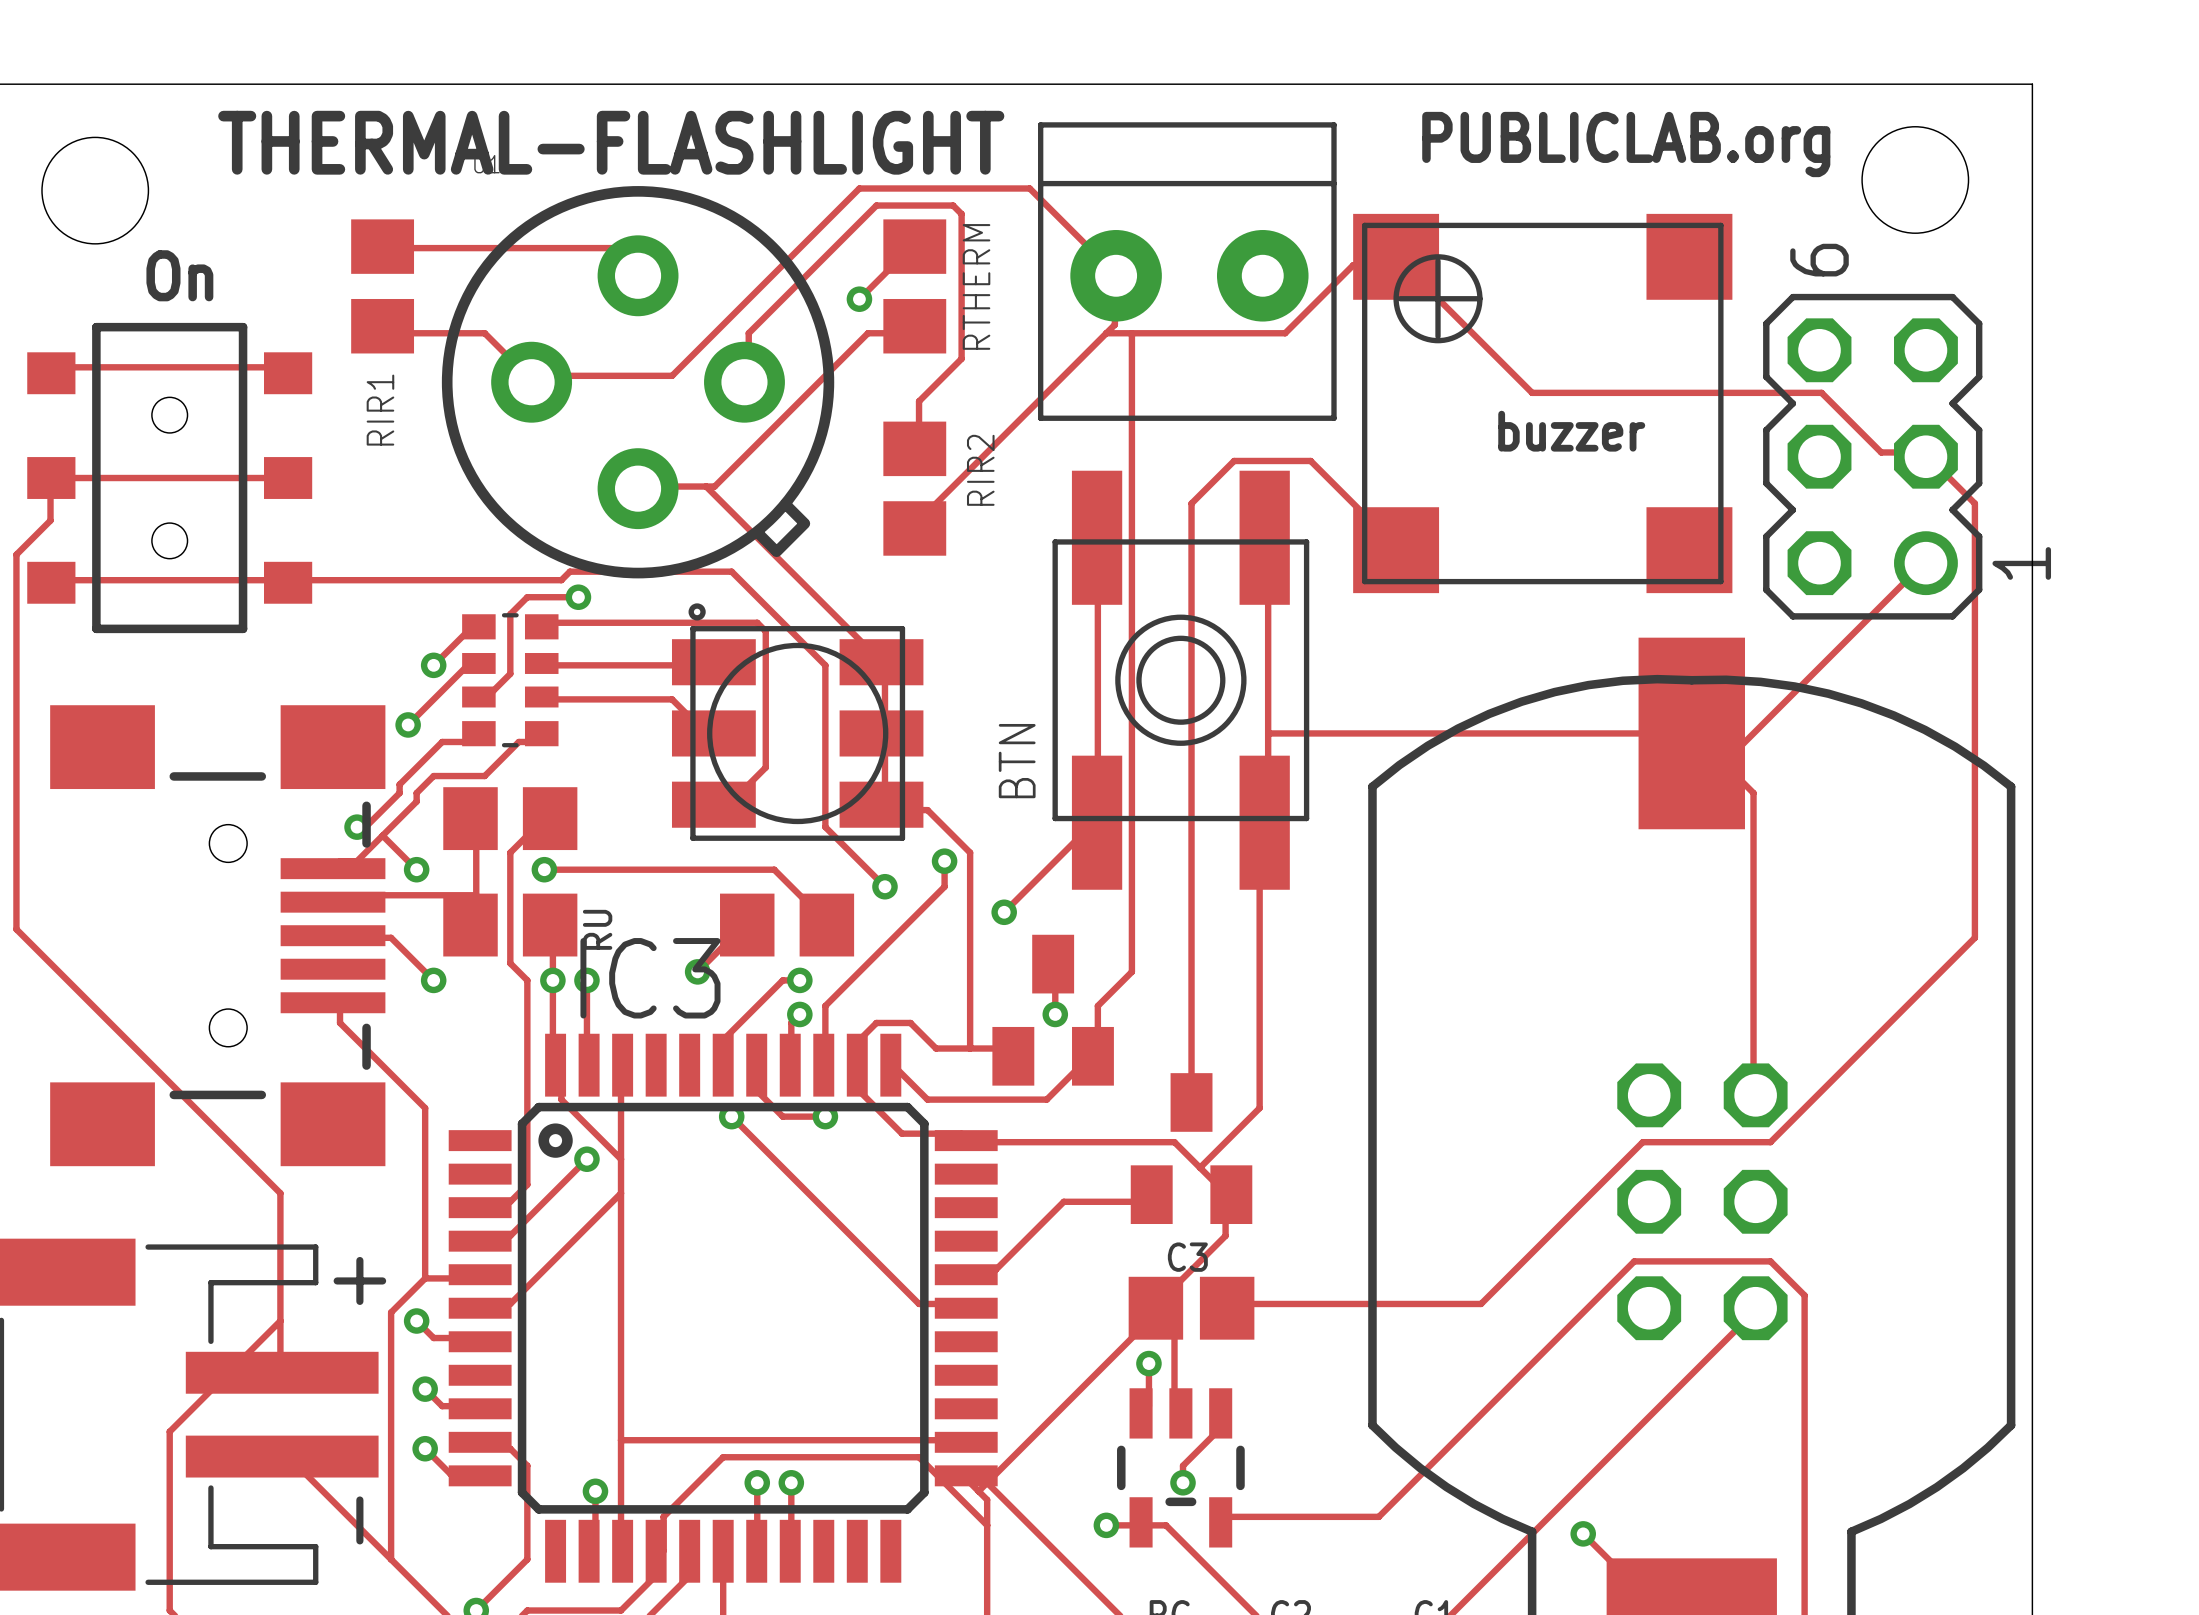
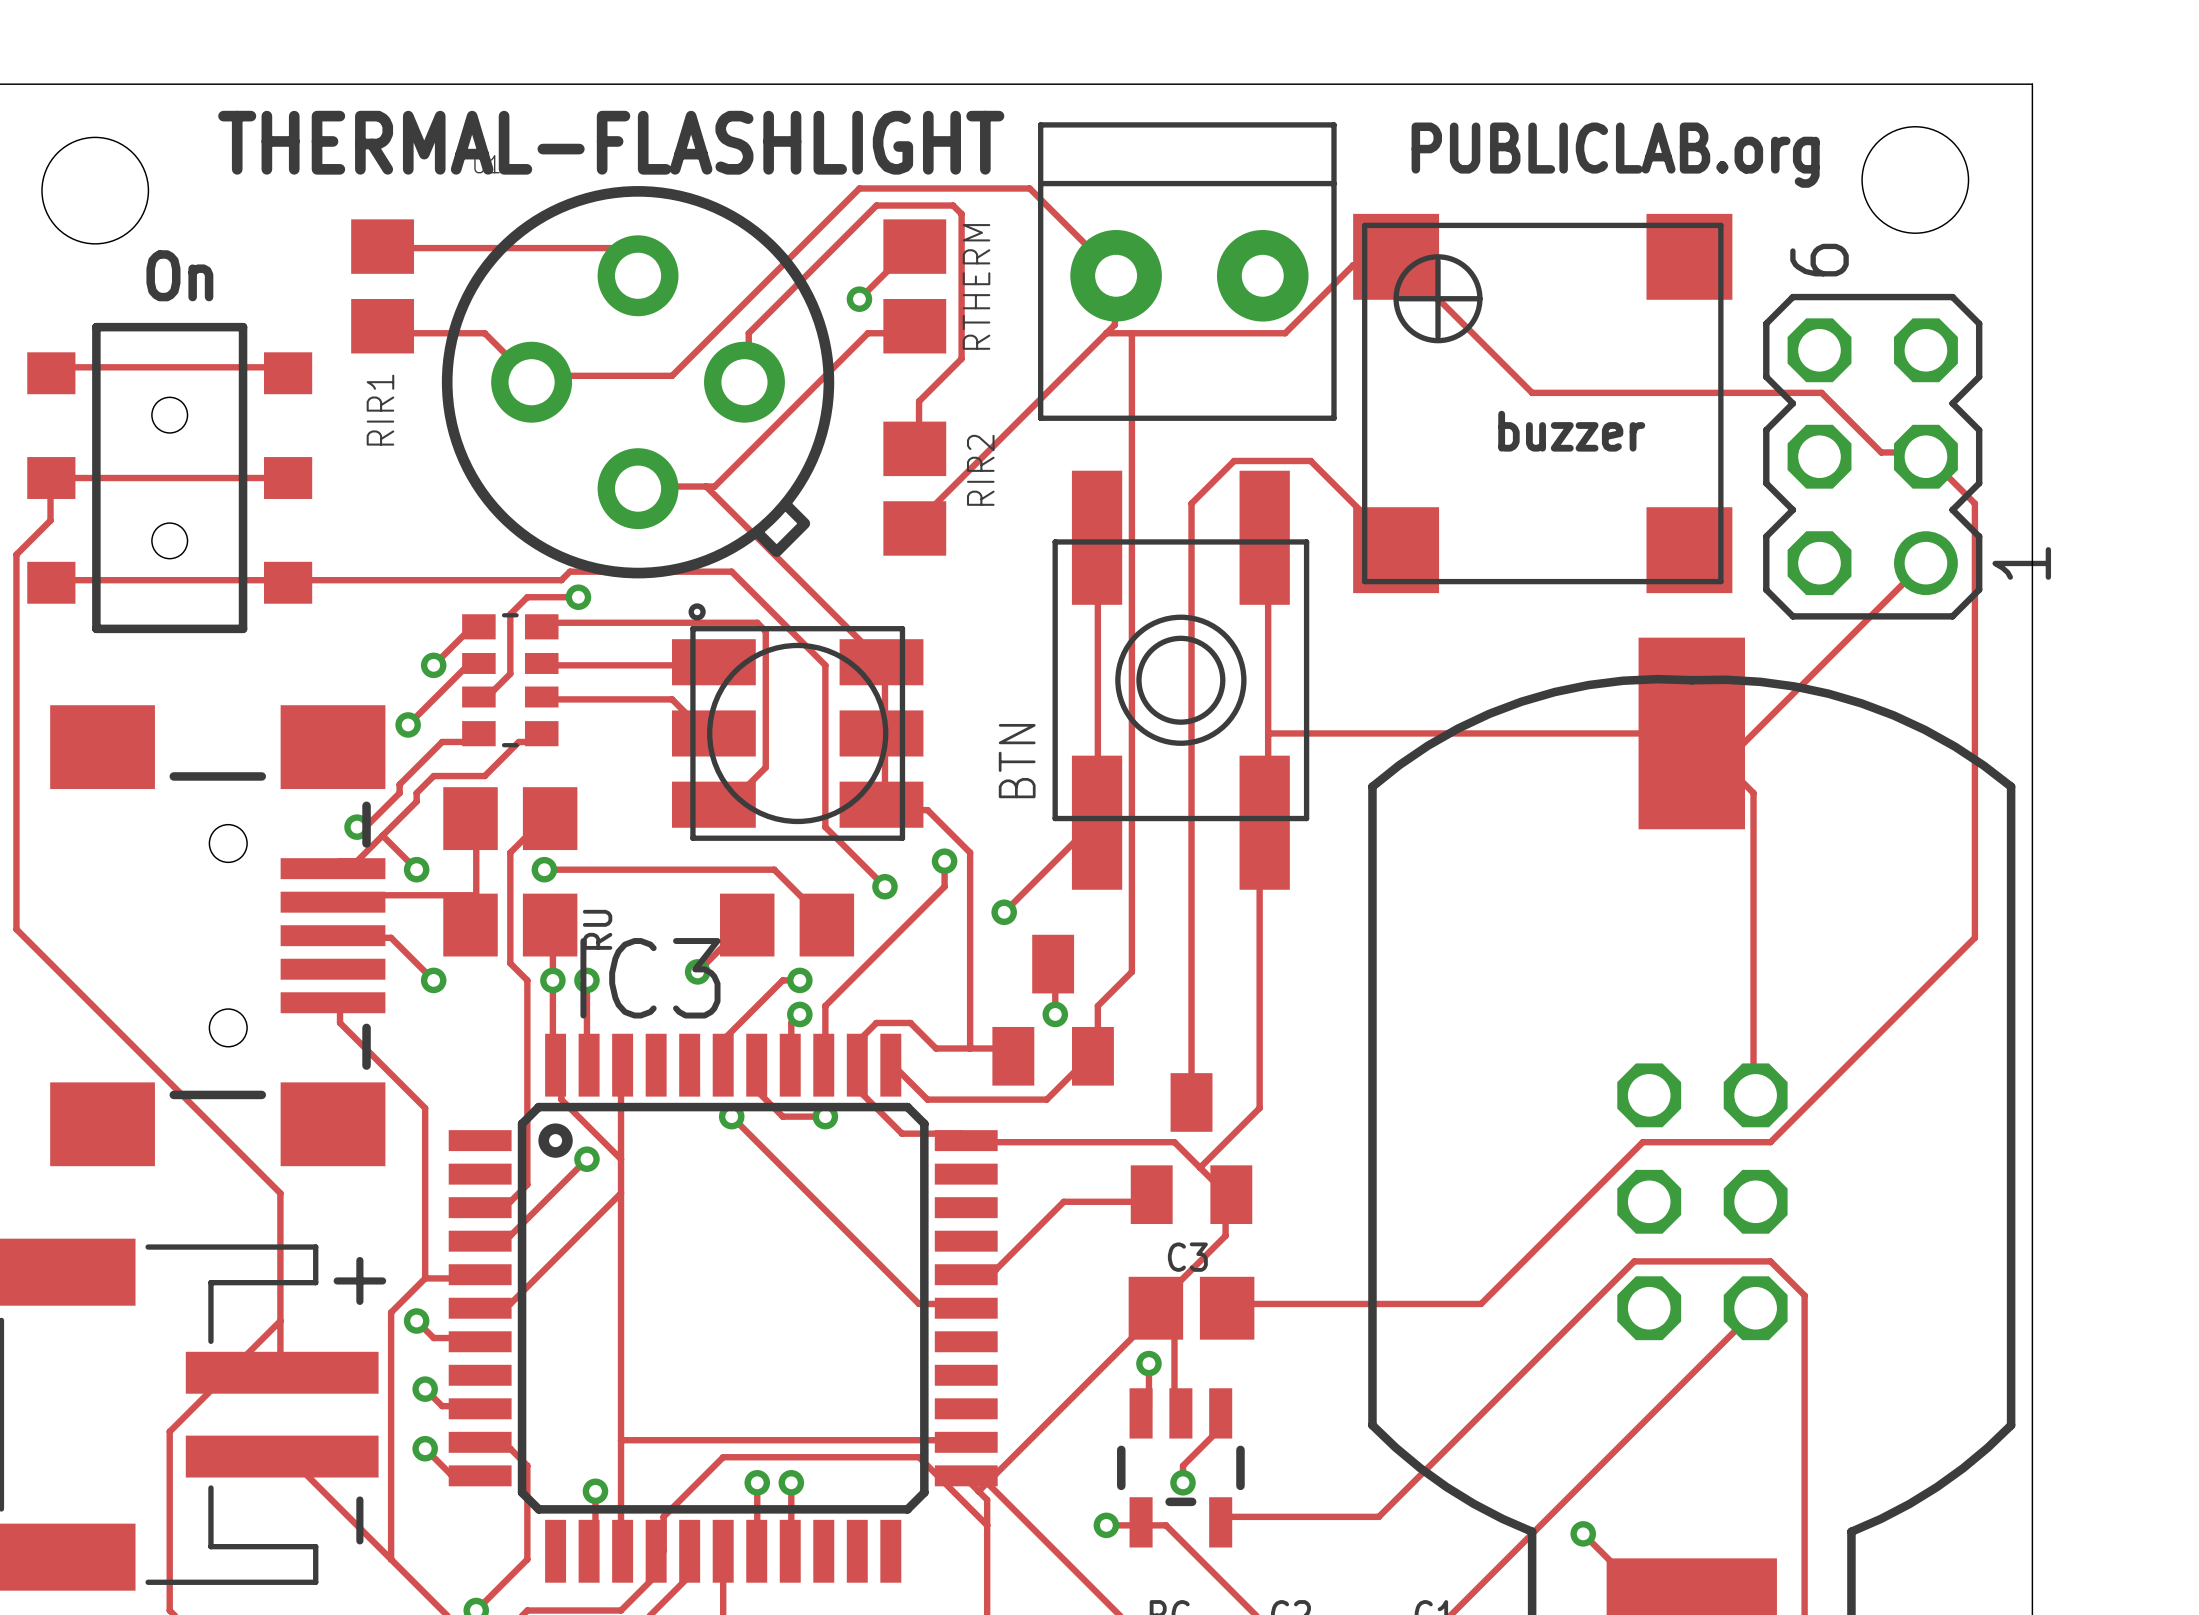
text position: PUBLICLAB.org (1626, 144) -> PUBLICLAB.org (1615, 155)

